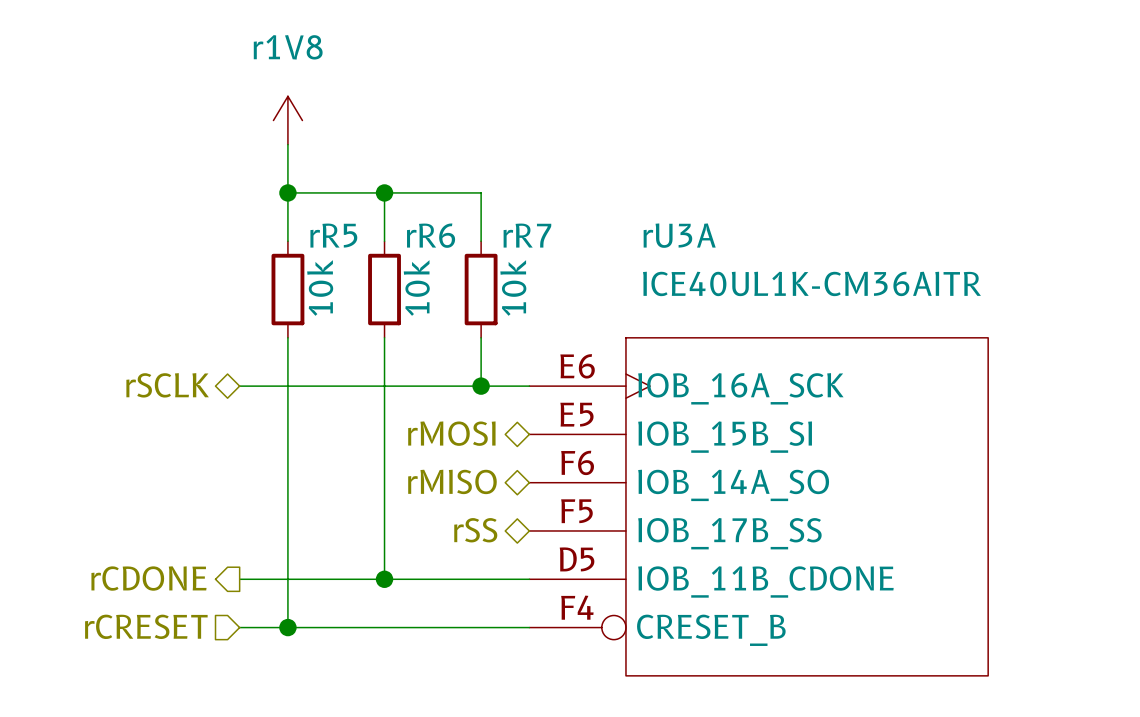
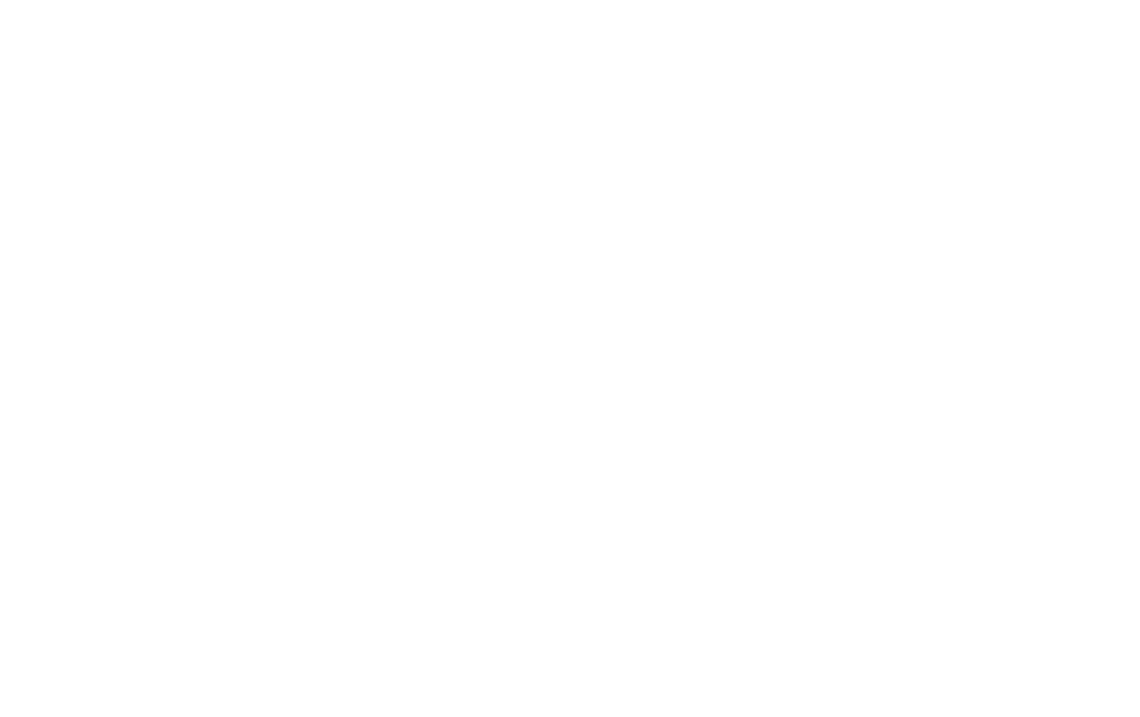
power symbol: r1V8 (287, 120) -> none
wire: (287, 144) (287, 241) -> none
wire: (287, 192) (481, 192) (481, 241) -> none
junction: (287, 192) -> none
wire: (384, 192) (384, 241) -> none
junction: (384, 192) -> none
rR5: 10k (287, 289) -> none
rR6: 10k (384, 289) -> none
rR7: 10k (481, 289) -> none
wire: (287, 337) (287, 627) -> none
wire: (384, 337) (384, 579) -> none
wire: (481, 337) (481, 386) -> none
hierarchical label: rSCLK (167, 385) -> none
wire: (239, 386) (529, 386) -> none
junction: (481, 386) -> none
hierarchical label: rMOSI (451, 433) -> none
hierarchical label: rMISO (452, 481) -> none
rU3A: ICE40UL1K-CM36AITR (758, 506) -> none
hierarchical label: rSS (475, 530) -> none
hierarchical label: rCDONE (148, 578) -> none
wire: (239, 579) (529, 579) -> none
junction: (384, 579) -> none
hierarchical label: rCRESET (146, 626) -> none
wire: (239, 627) (529, 627) -> none
junction: (287, 627) -> none

